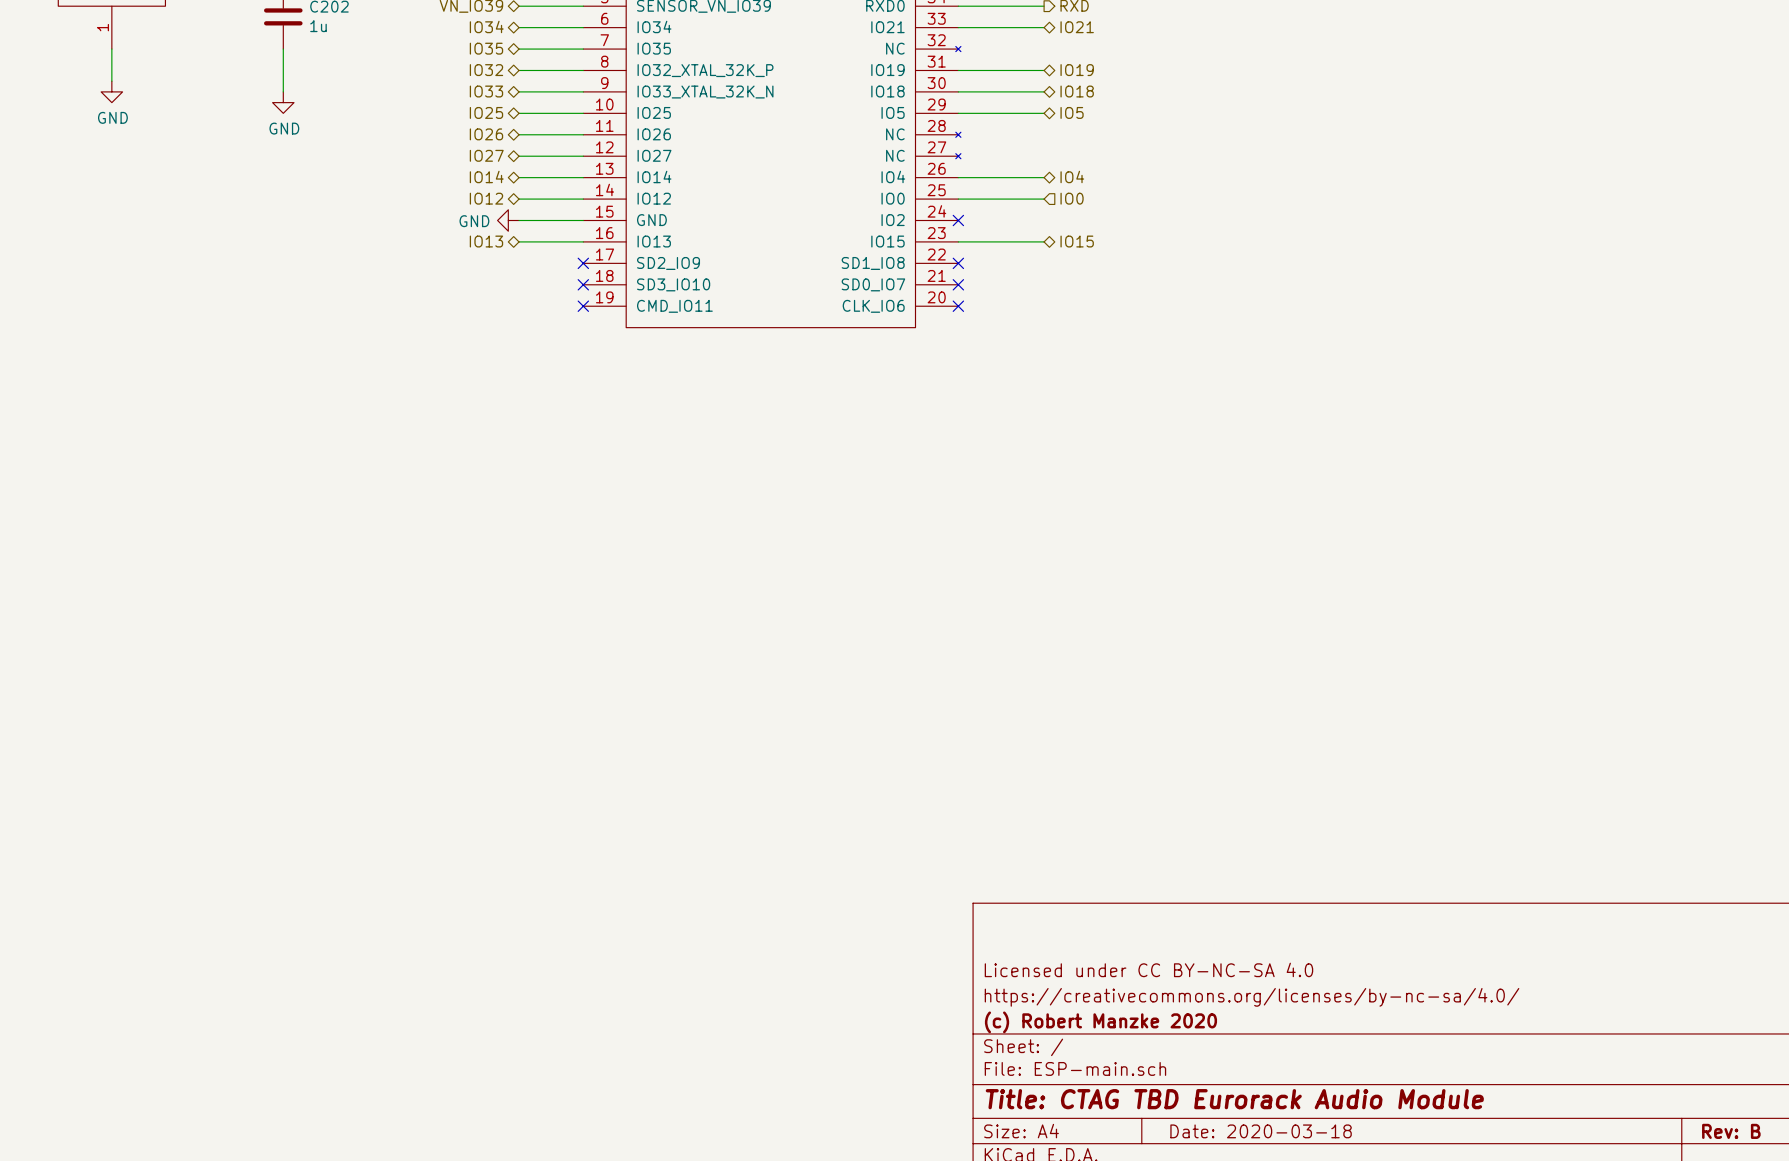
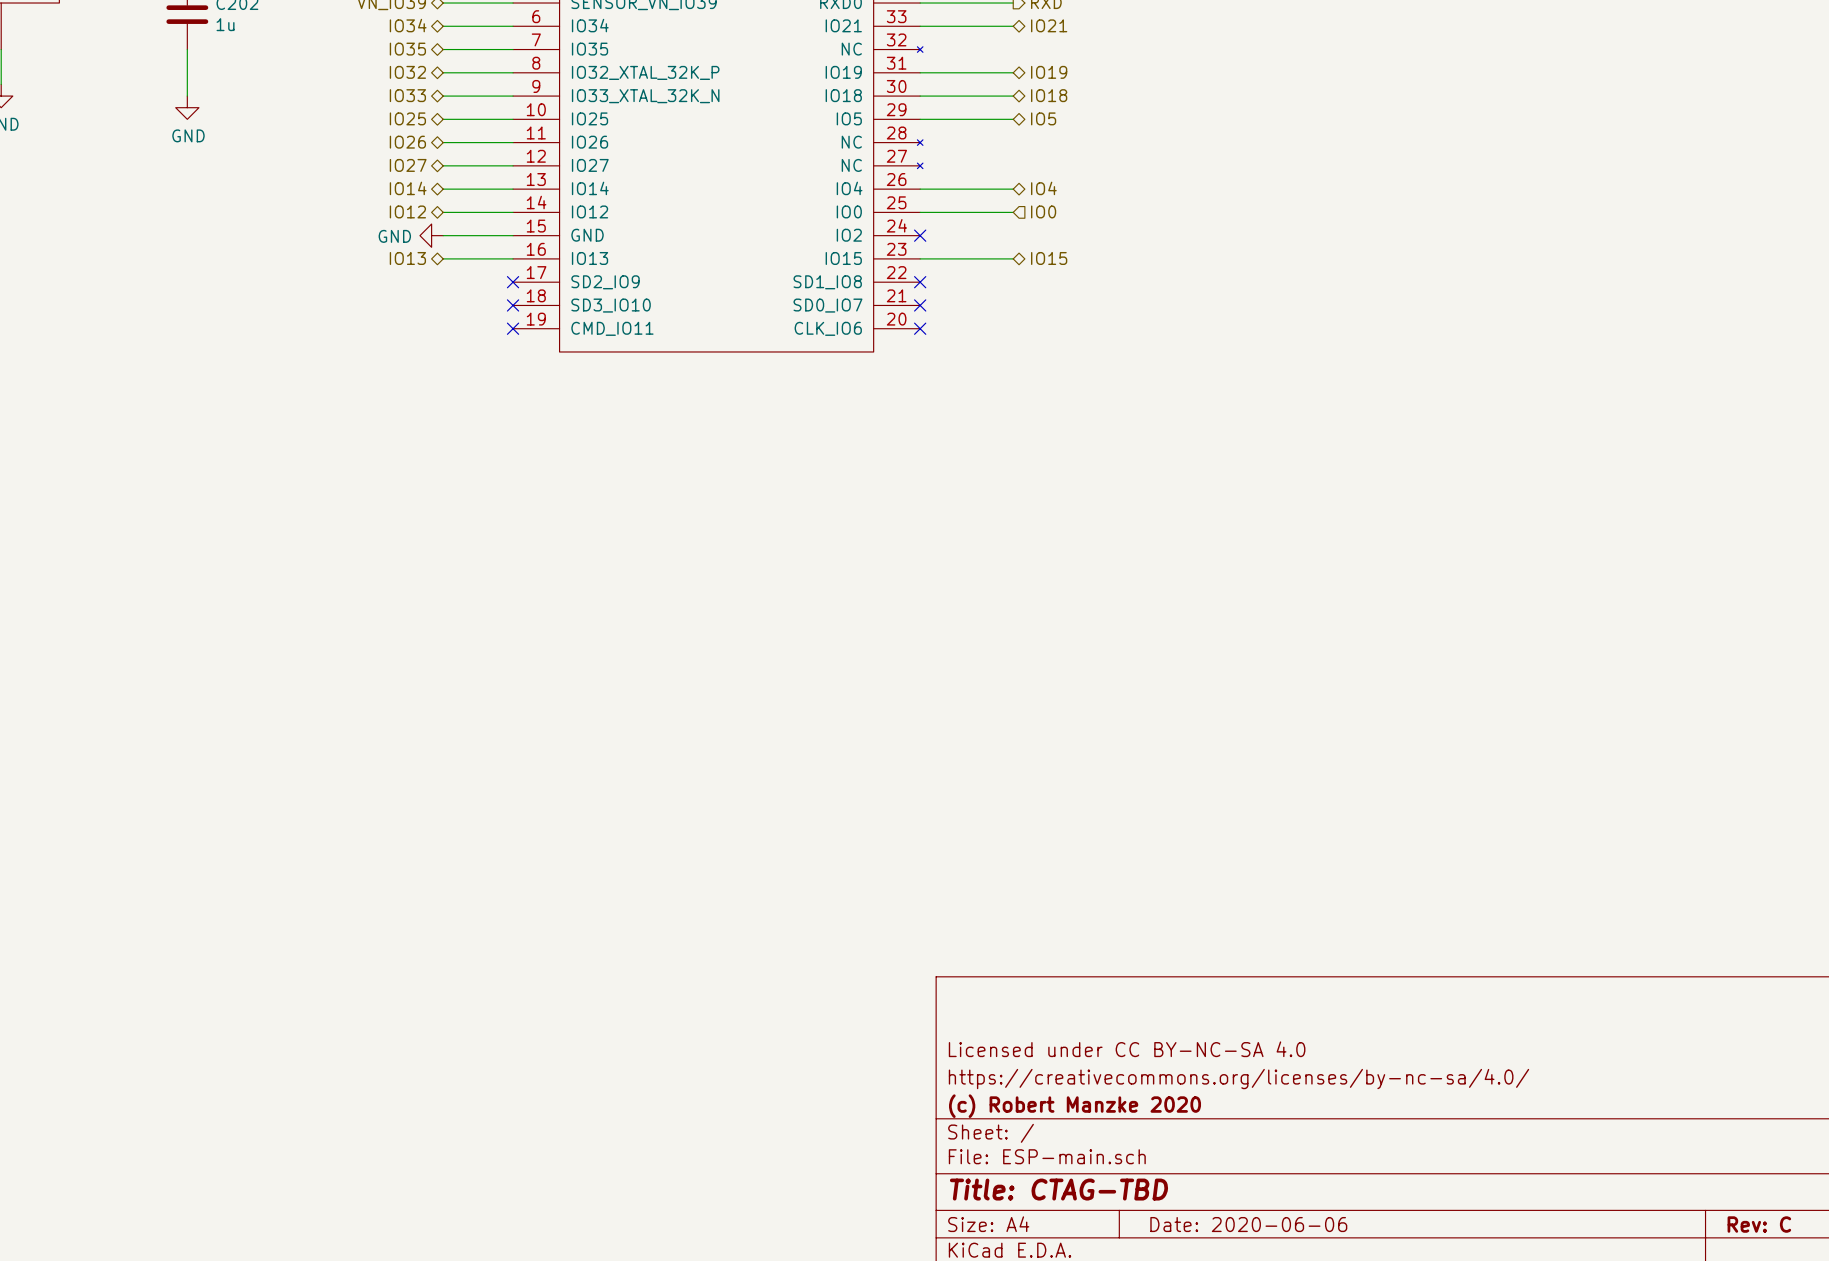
title block: Title: CTAG TBD Eurorack Audio Module (1234, 1099) -> Title: CTAG-TBD (1058, 1189)
title block: Date: 2020-03-18 (1261, 1131) -> Date: 2020-06-06 (1248, 1224)
title block: Rev: B (1731, 1131) -> Rev: C (1759, 1224)

